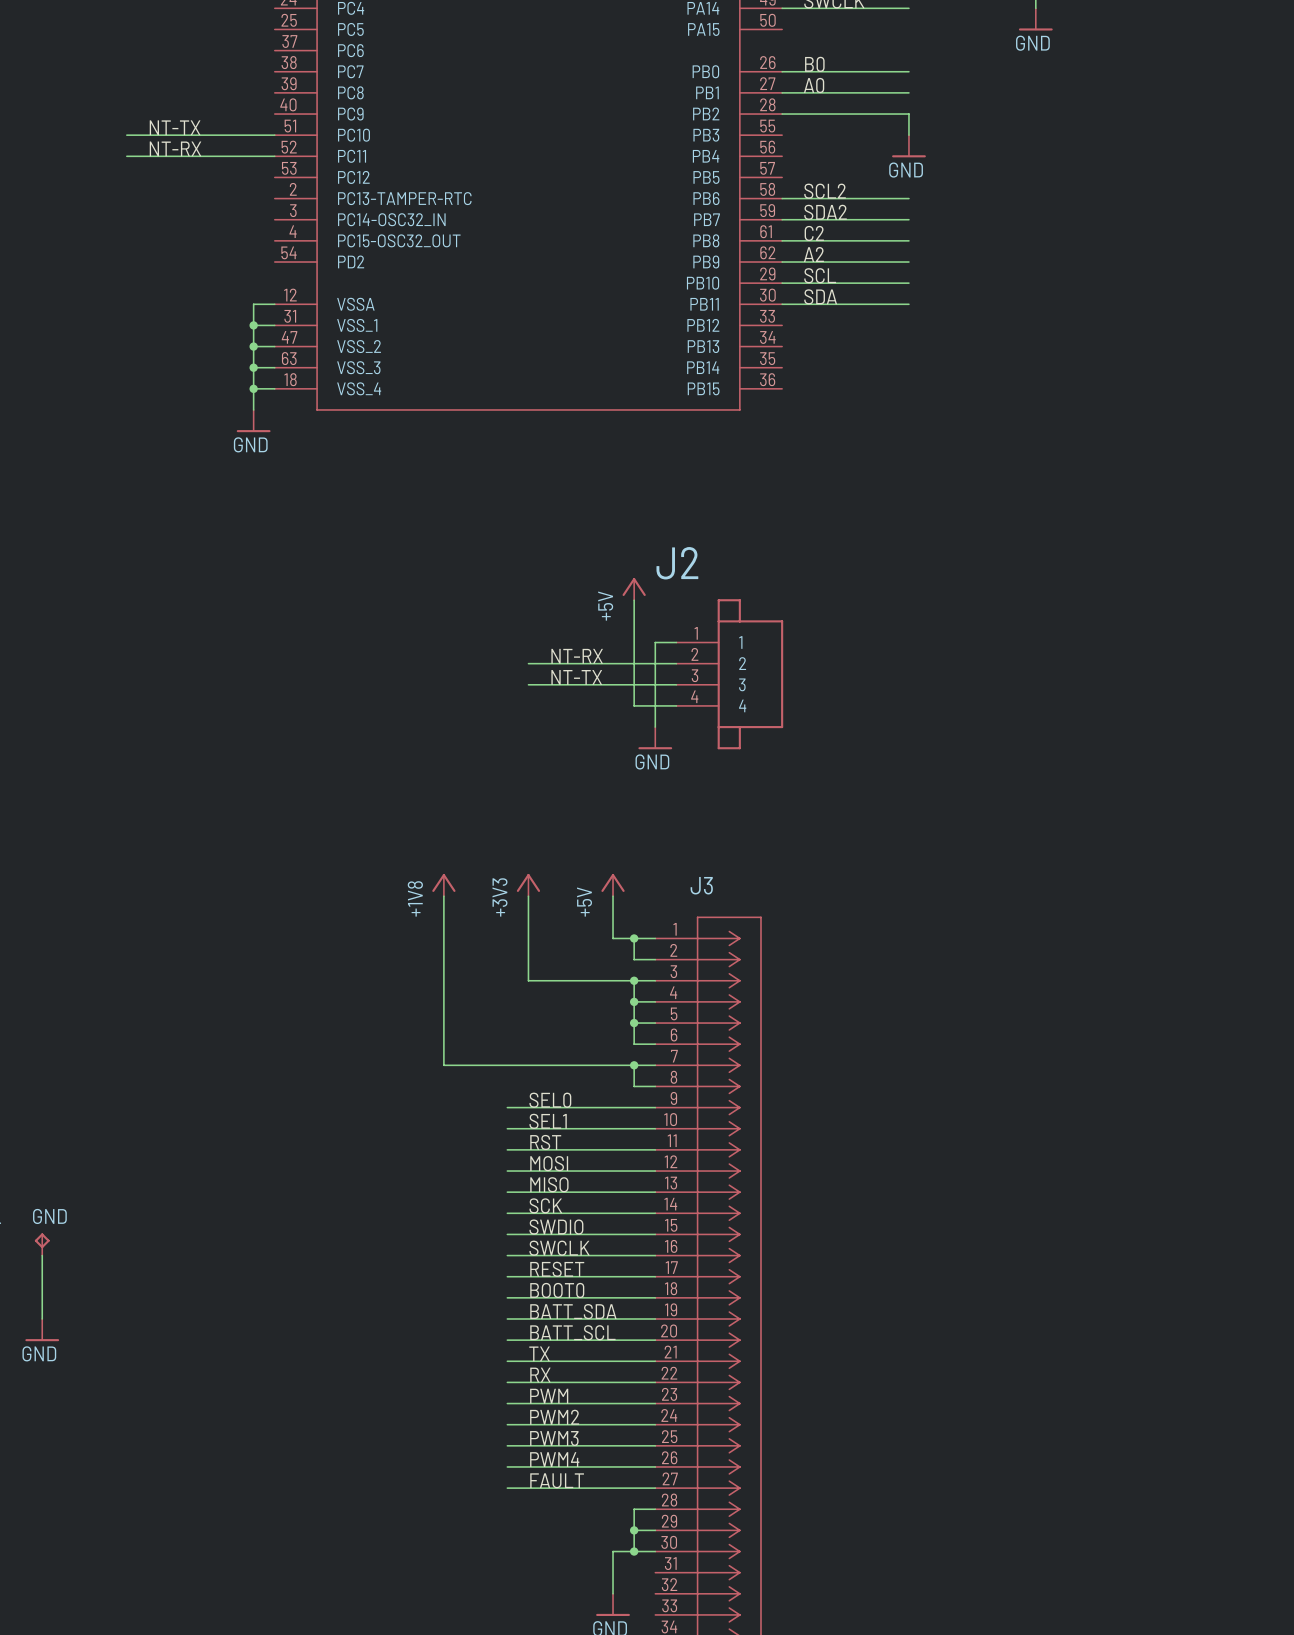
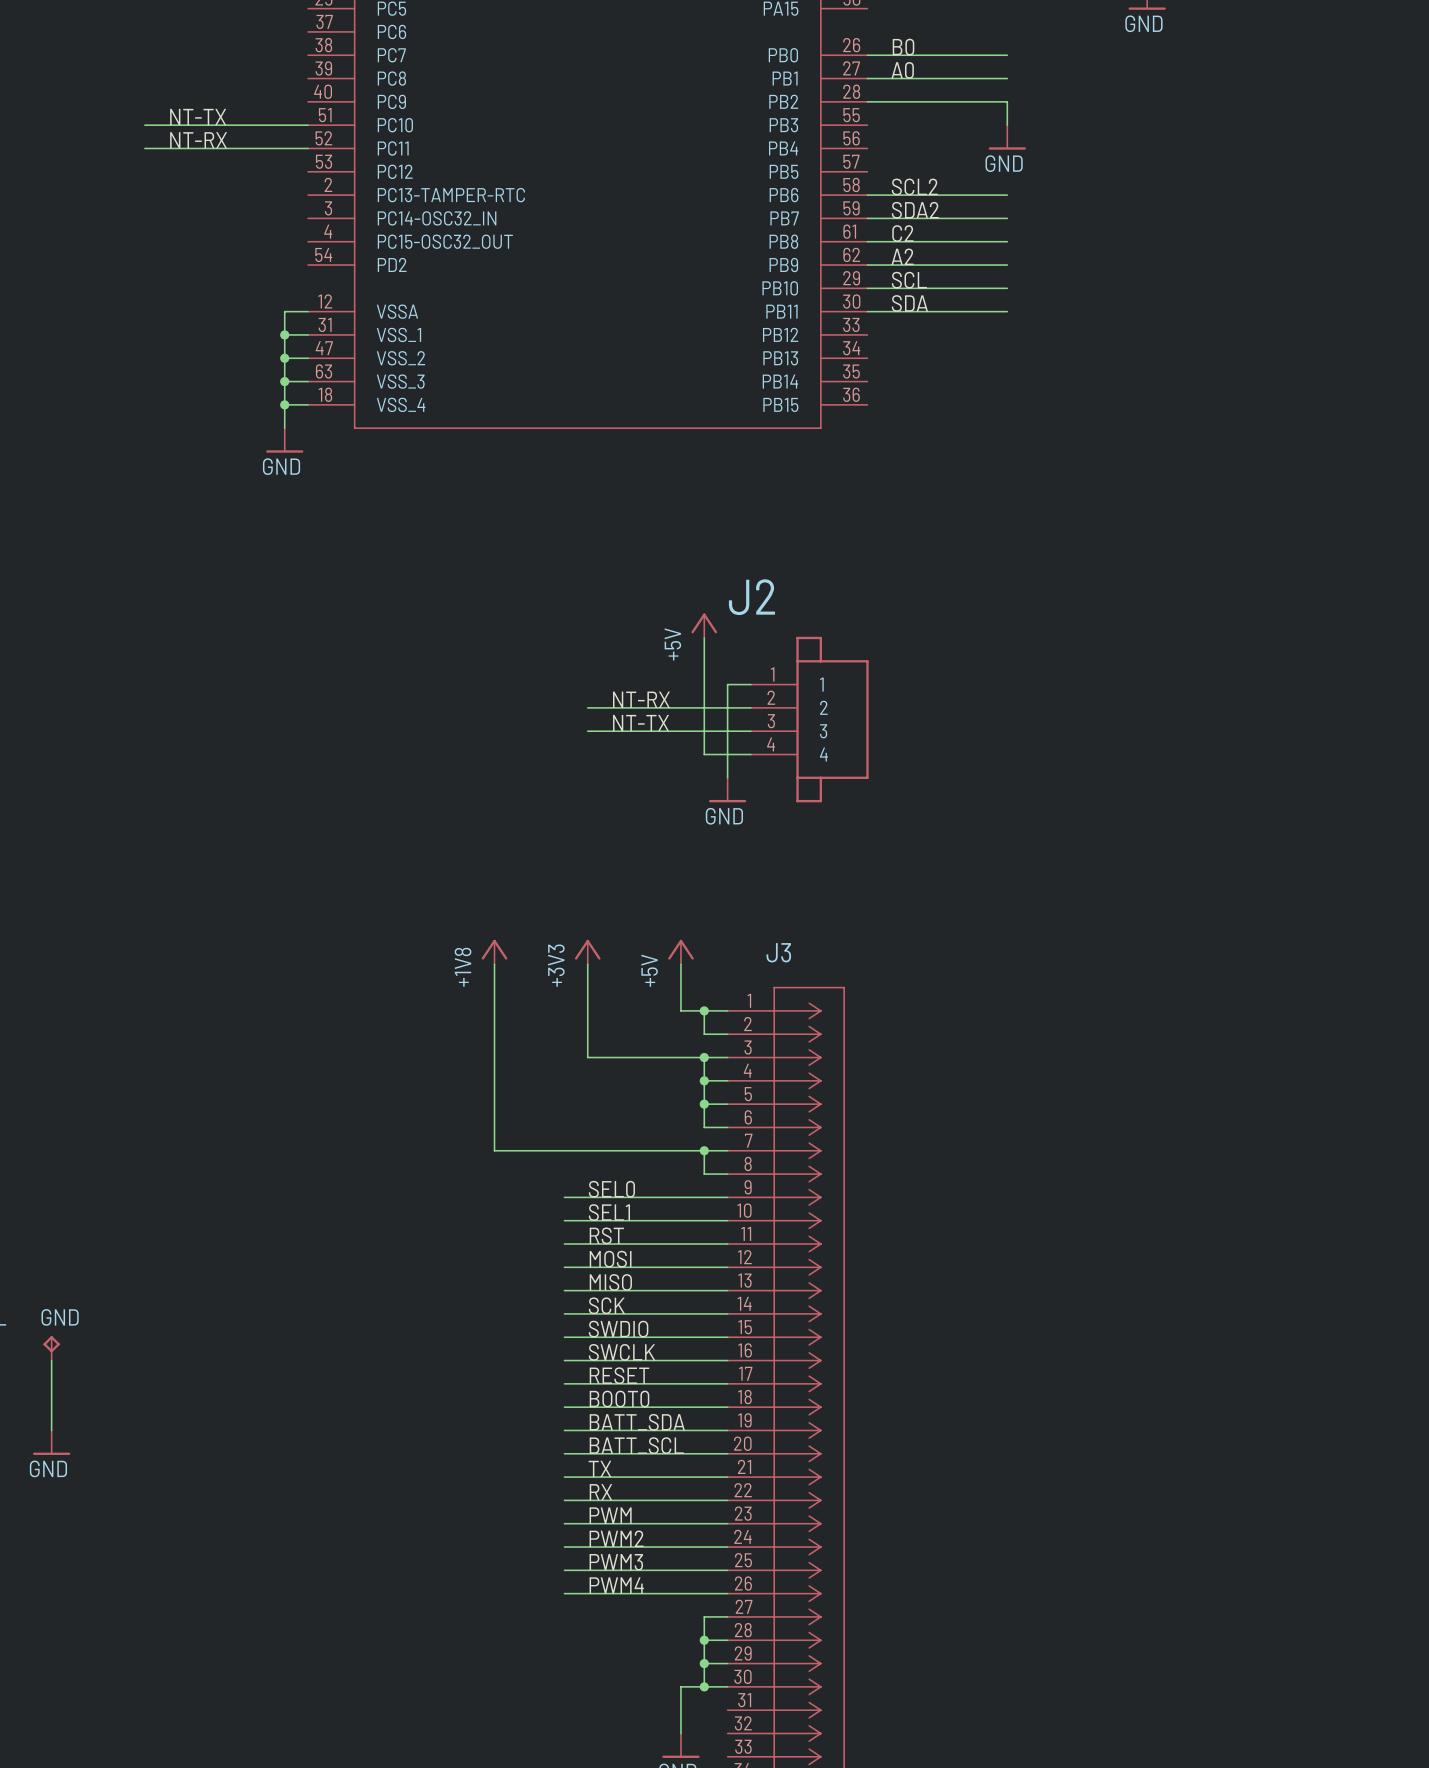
label: FAULT (557, 1480) -> none
wire: (507, 1488) (634, 1488) -> (704, 1640) (704, 1616)
junction: none -> (704, 1640)

